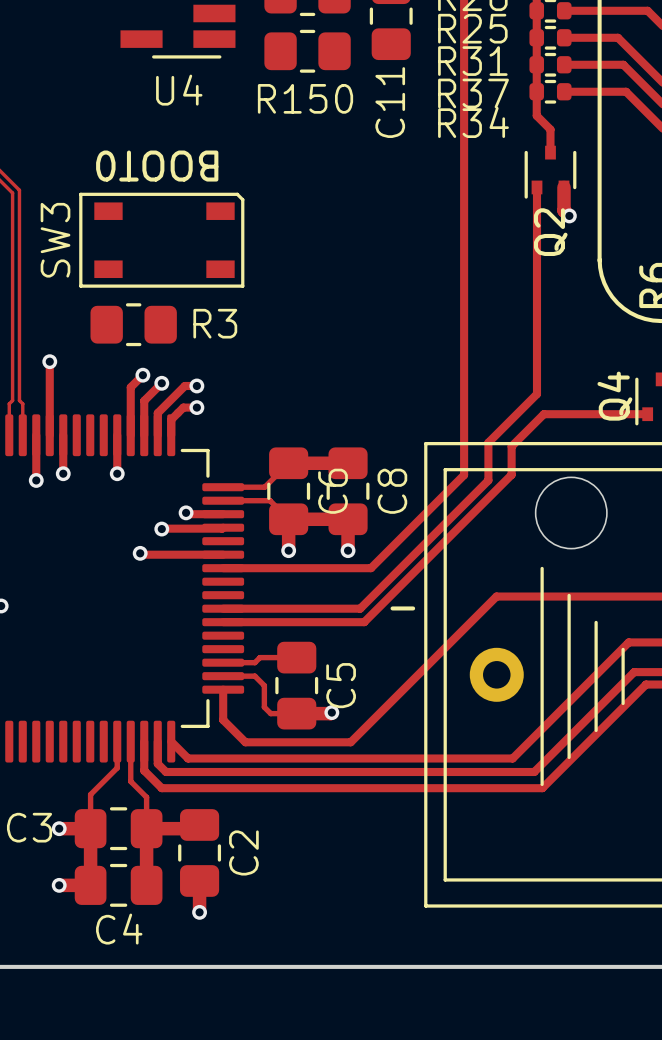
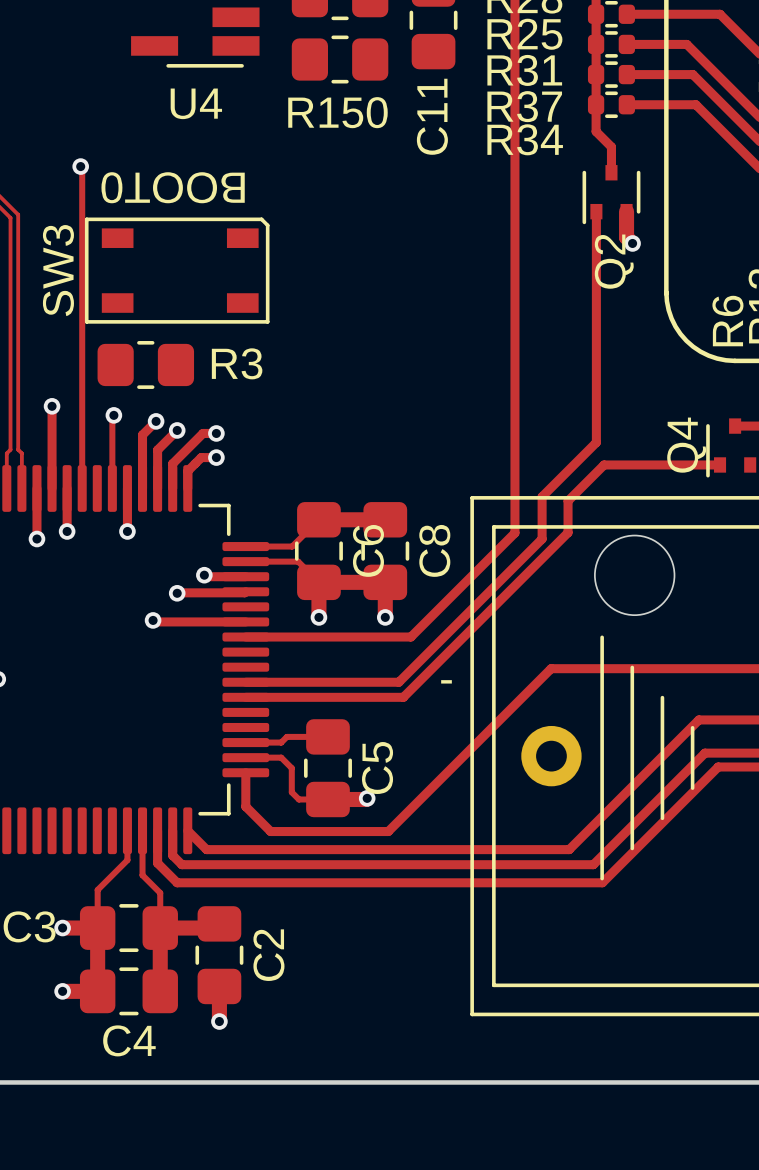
track: none -> (80, 166) (82, 168) (82, 488)
via: none -> (80, 166)
track: none -> (113, 415) (112, 488)
via: none -> (113, 415)

